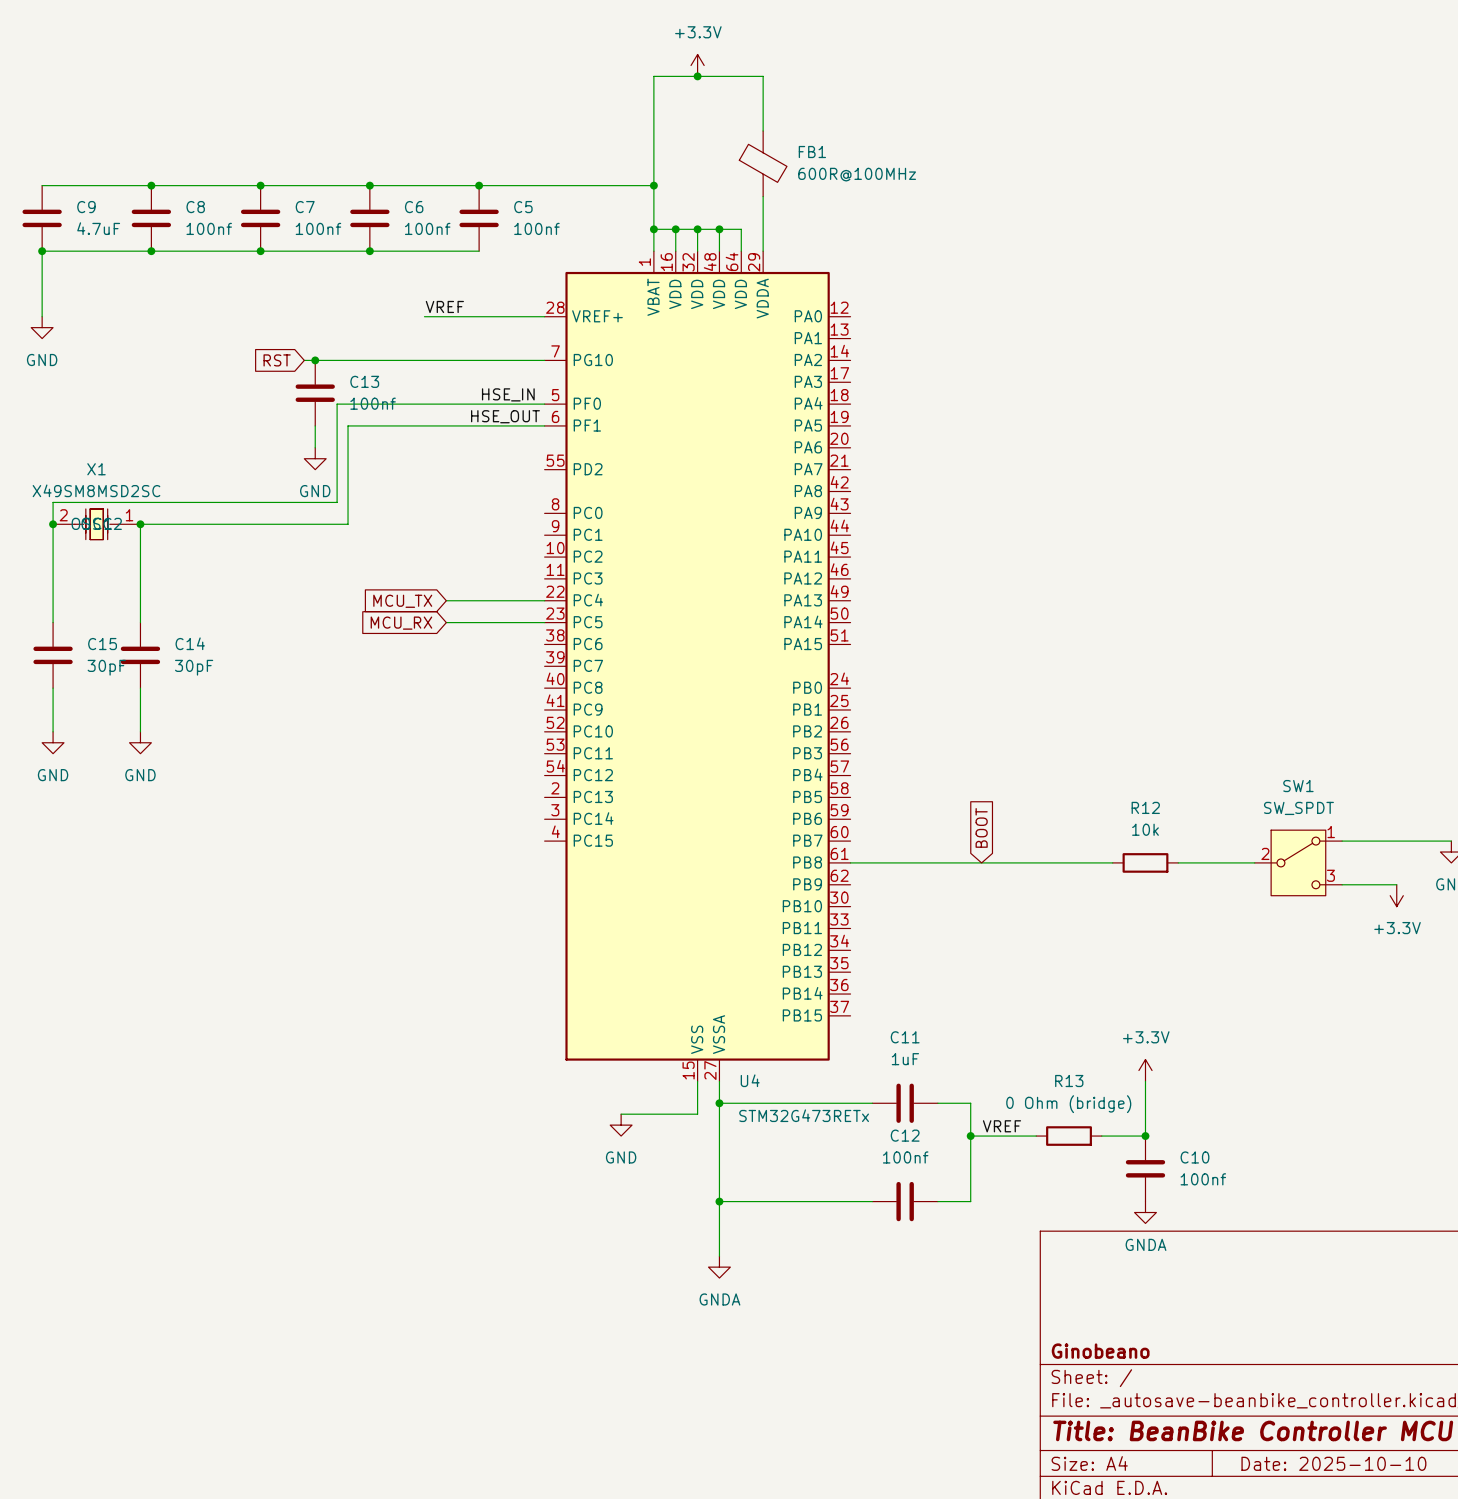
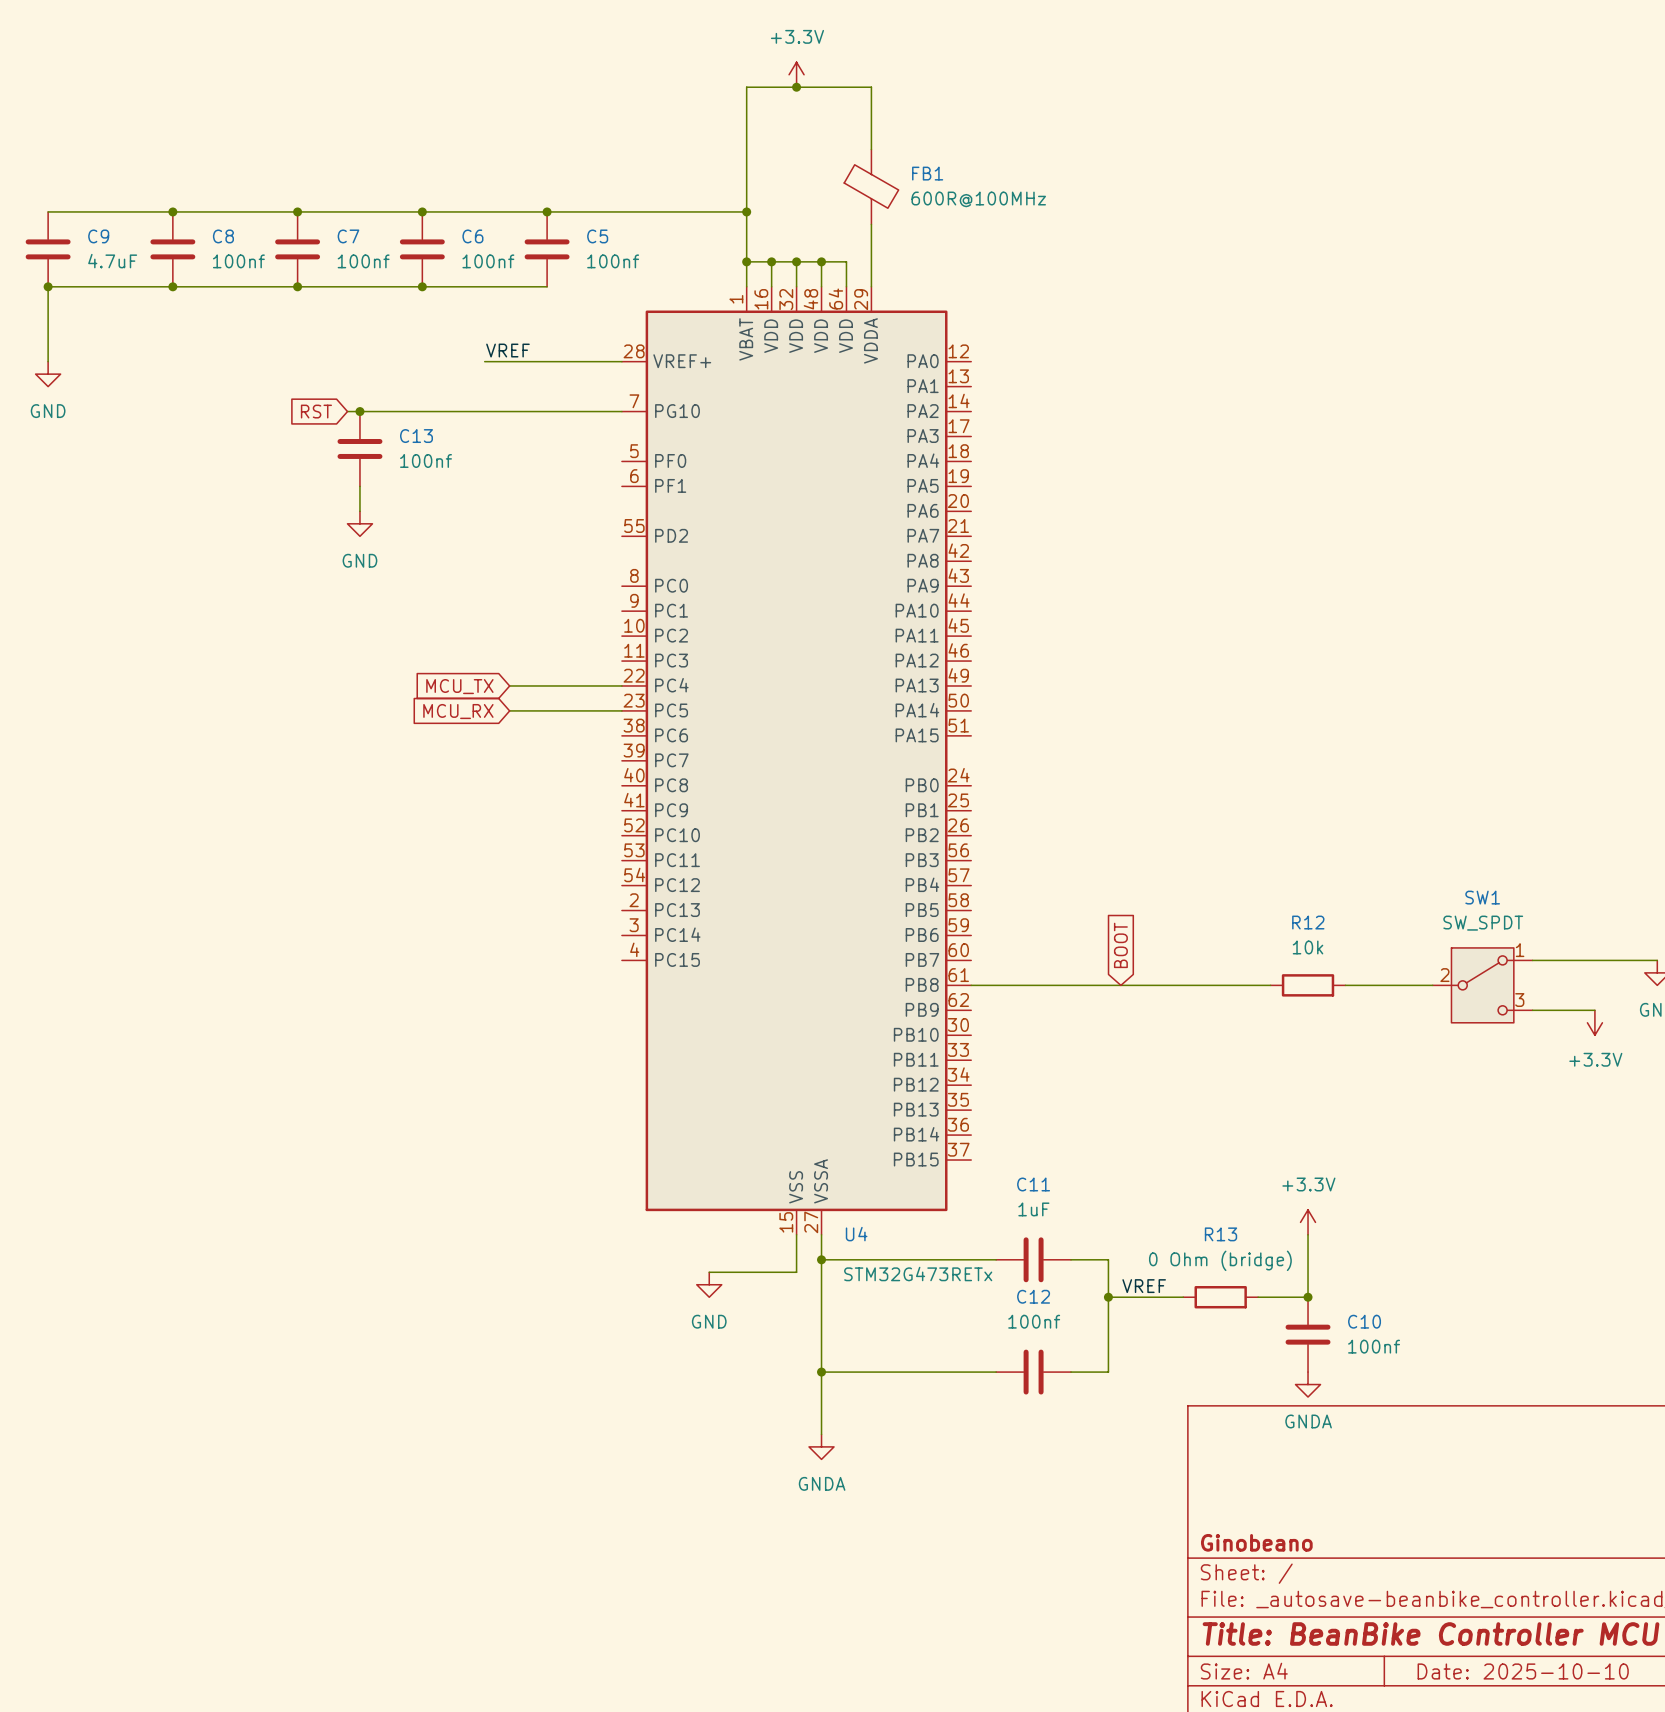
label: HSE_IN (508, 394) -> none
wire: (544, 404) (337, 404) (337, 502) (53, 502) (53, 622) -> none
label: HSE_OUT (505, 416) -> none
wire: (544, 425) (348, 425) (348, 524) (140, 524) (140, 622) -> none
junction: (53, 524) -> none
X1: X49SM8MSD2SC (96, 524) -> none
junction: (140, 524) -> none
C15: 30pF (53, 655) -> none
C14: 30pF (140, 655) -> none
wire: (53, 688) (53, 731) -> none
wire: (140, 688) (140, 731) -> none
power symbol: GND (53, 742) -> none
power symbol: GND (140, 742) -> none

